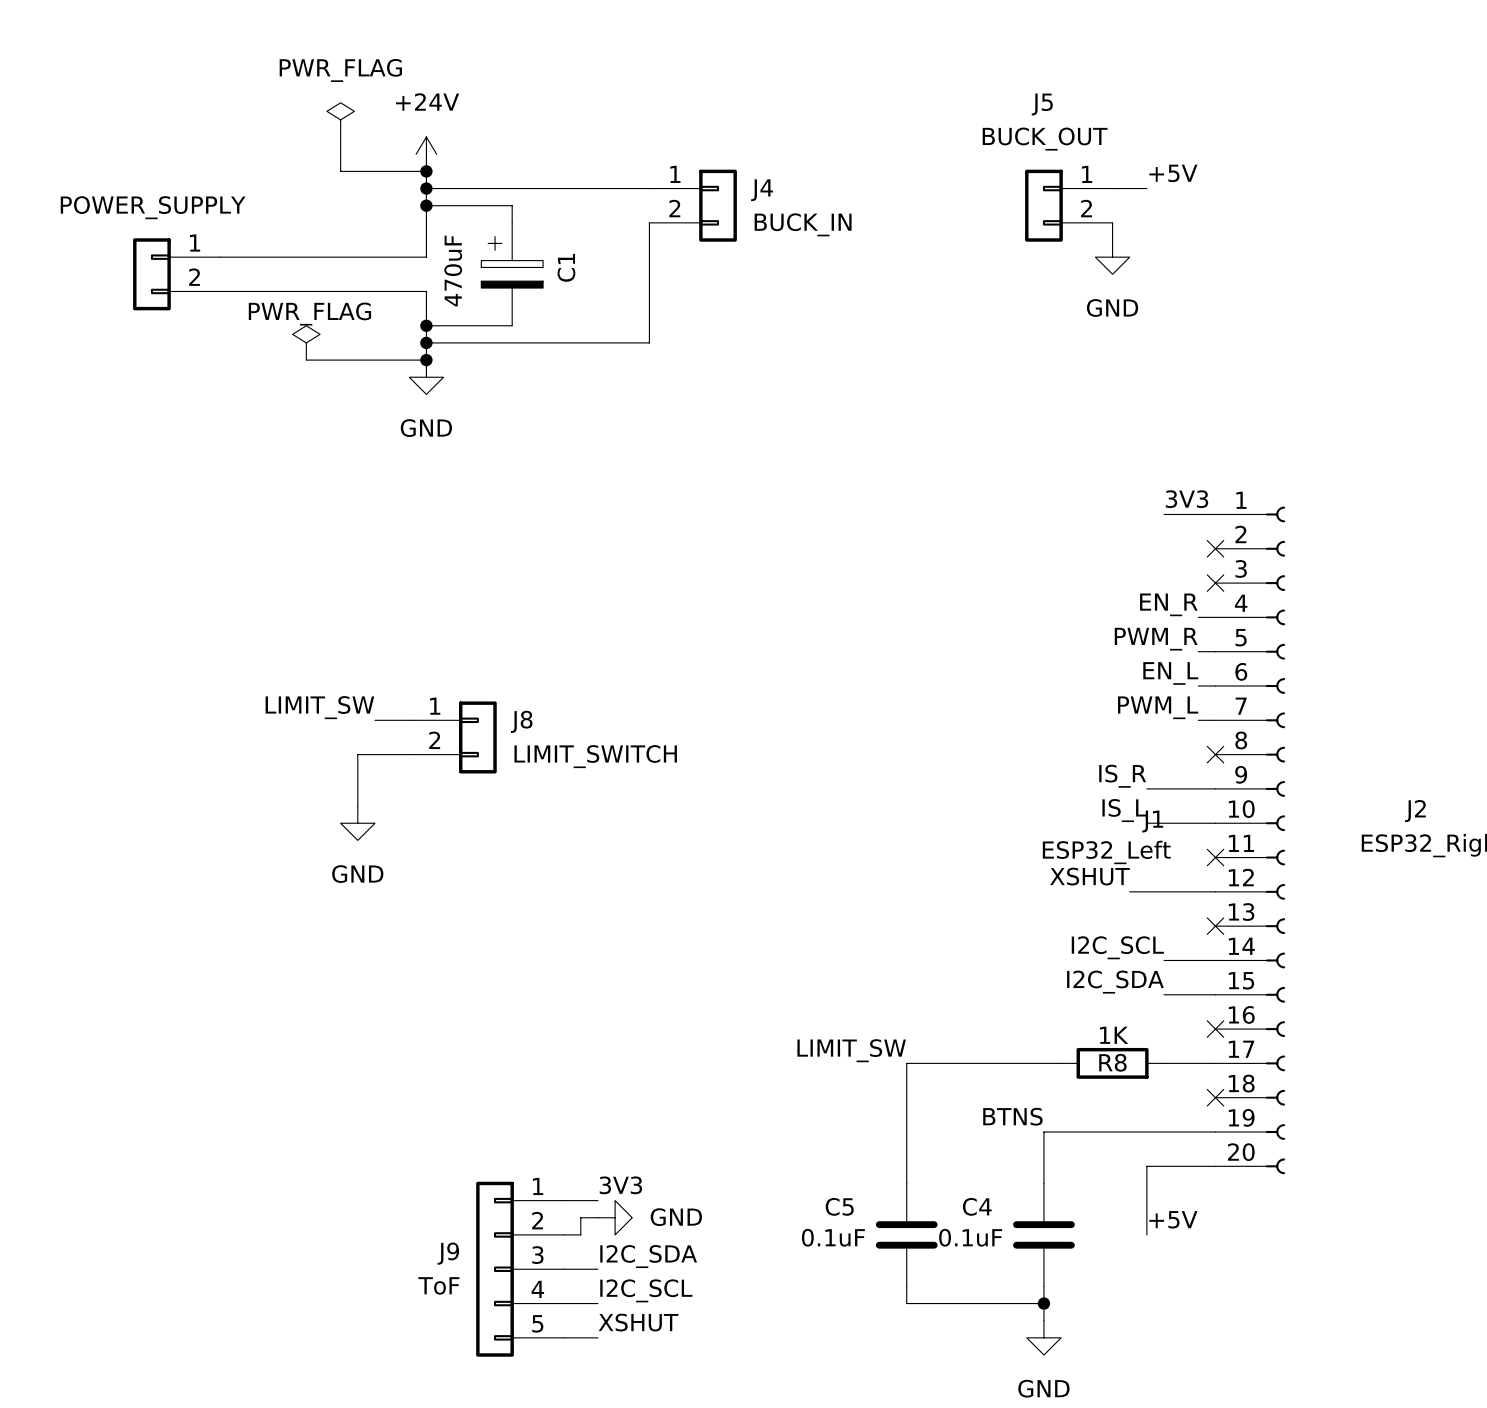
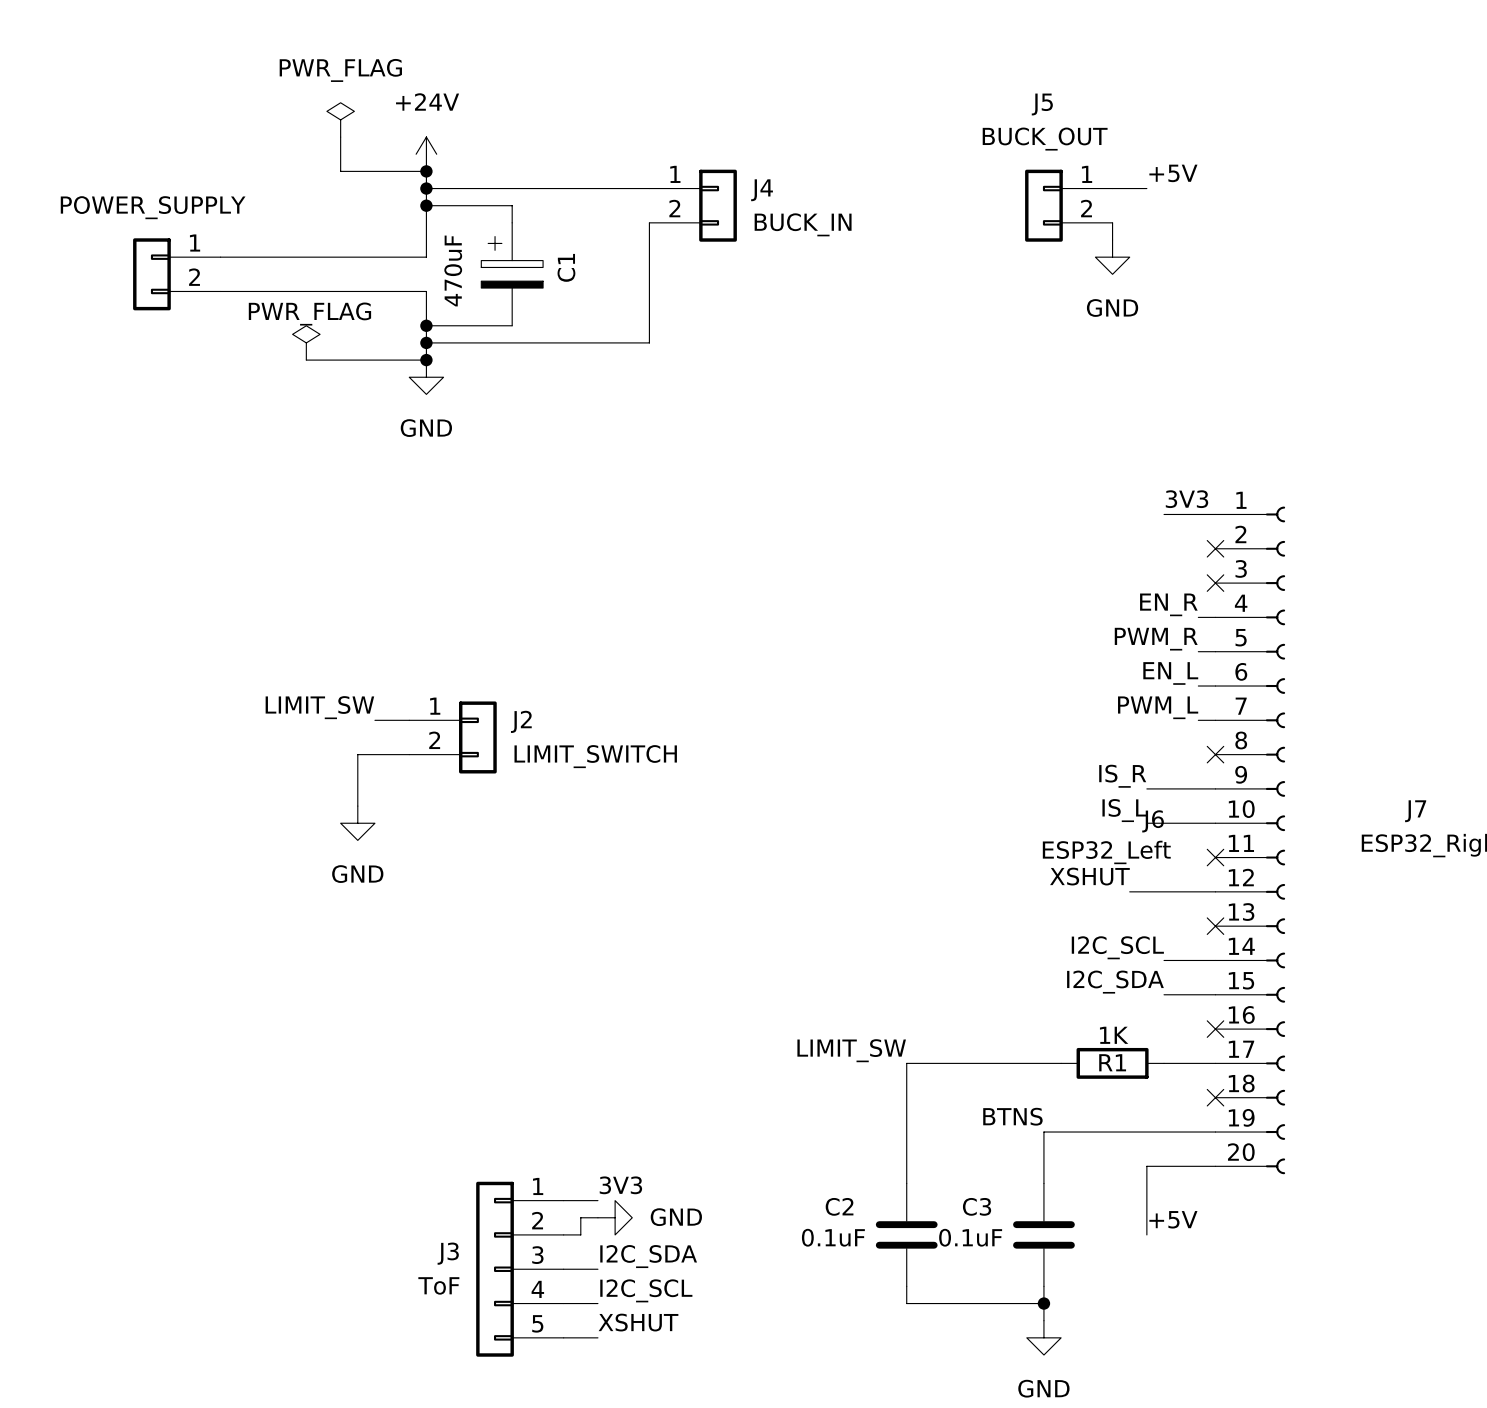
J8 name: J8 (521, 721) -> J2 (521, 721)
J2 name: J2 (1415, 811) -> J7 (1415, 811)
J1 name: J1 (1152, 821) -> J6 (1153, 821)
R8 name: R8 (1112, 1062) -> R1 (1112, 1062)
C5 name: C5 (839, 1206) -> C2 (839, 1206)
C4 name: C4 (977, 1206) -> C3 (977, 1206)
J9 name: J9 (448, 1253) -> J3 (448, 1253)

